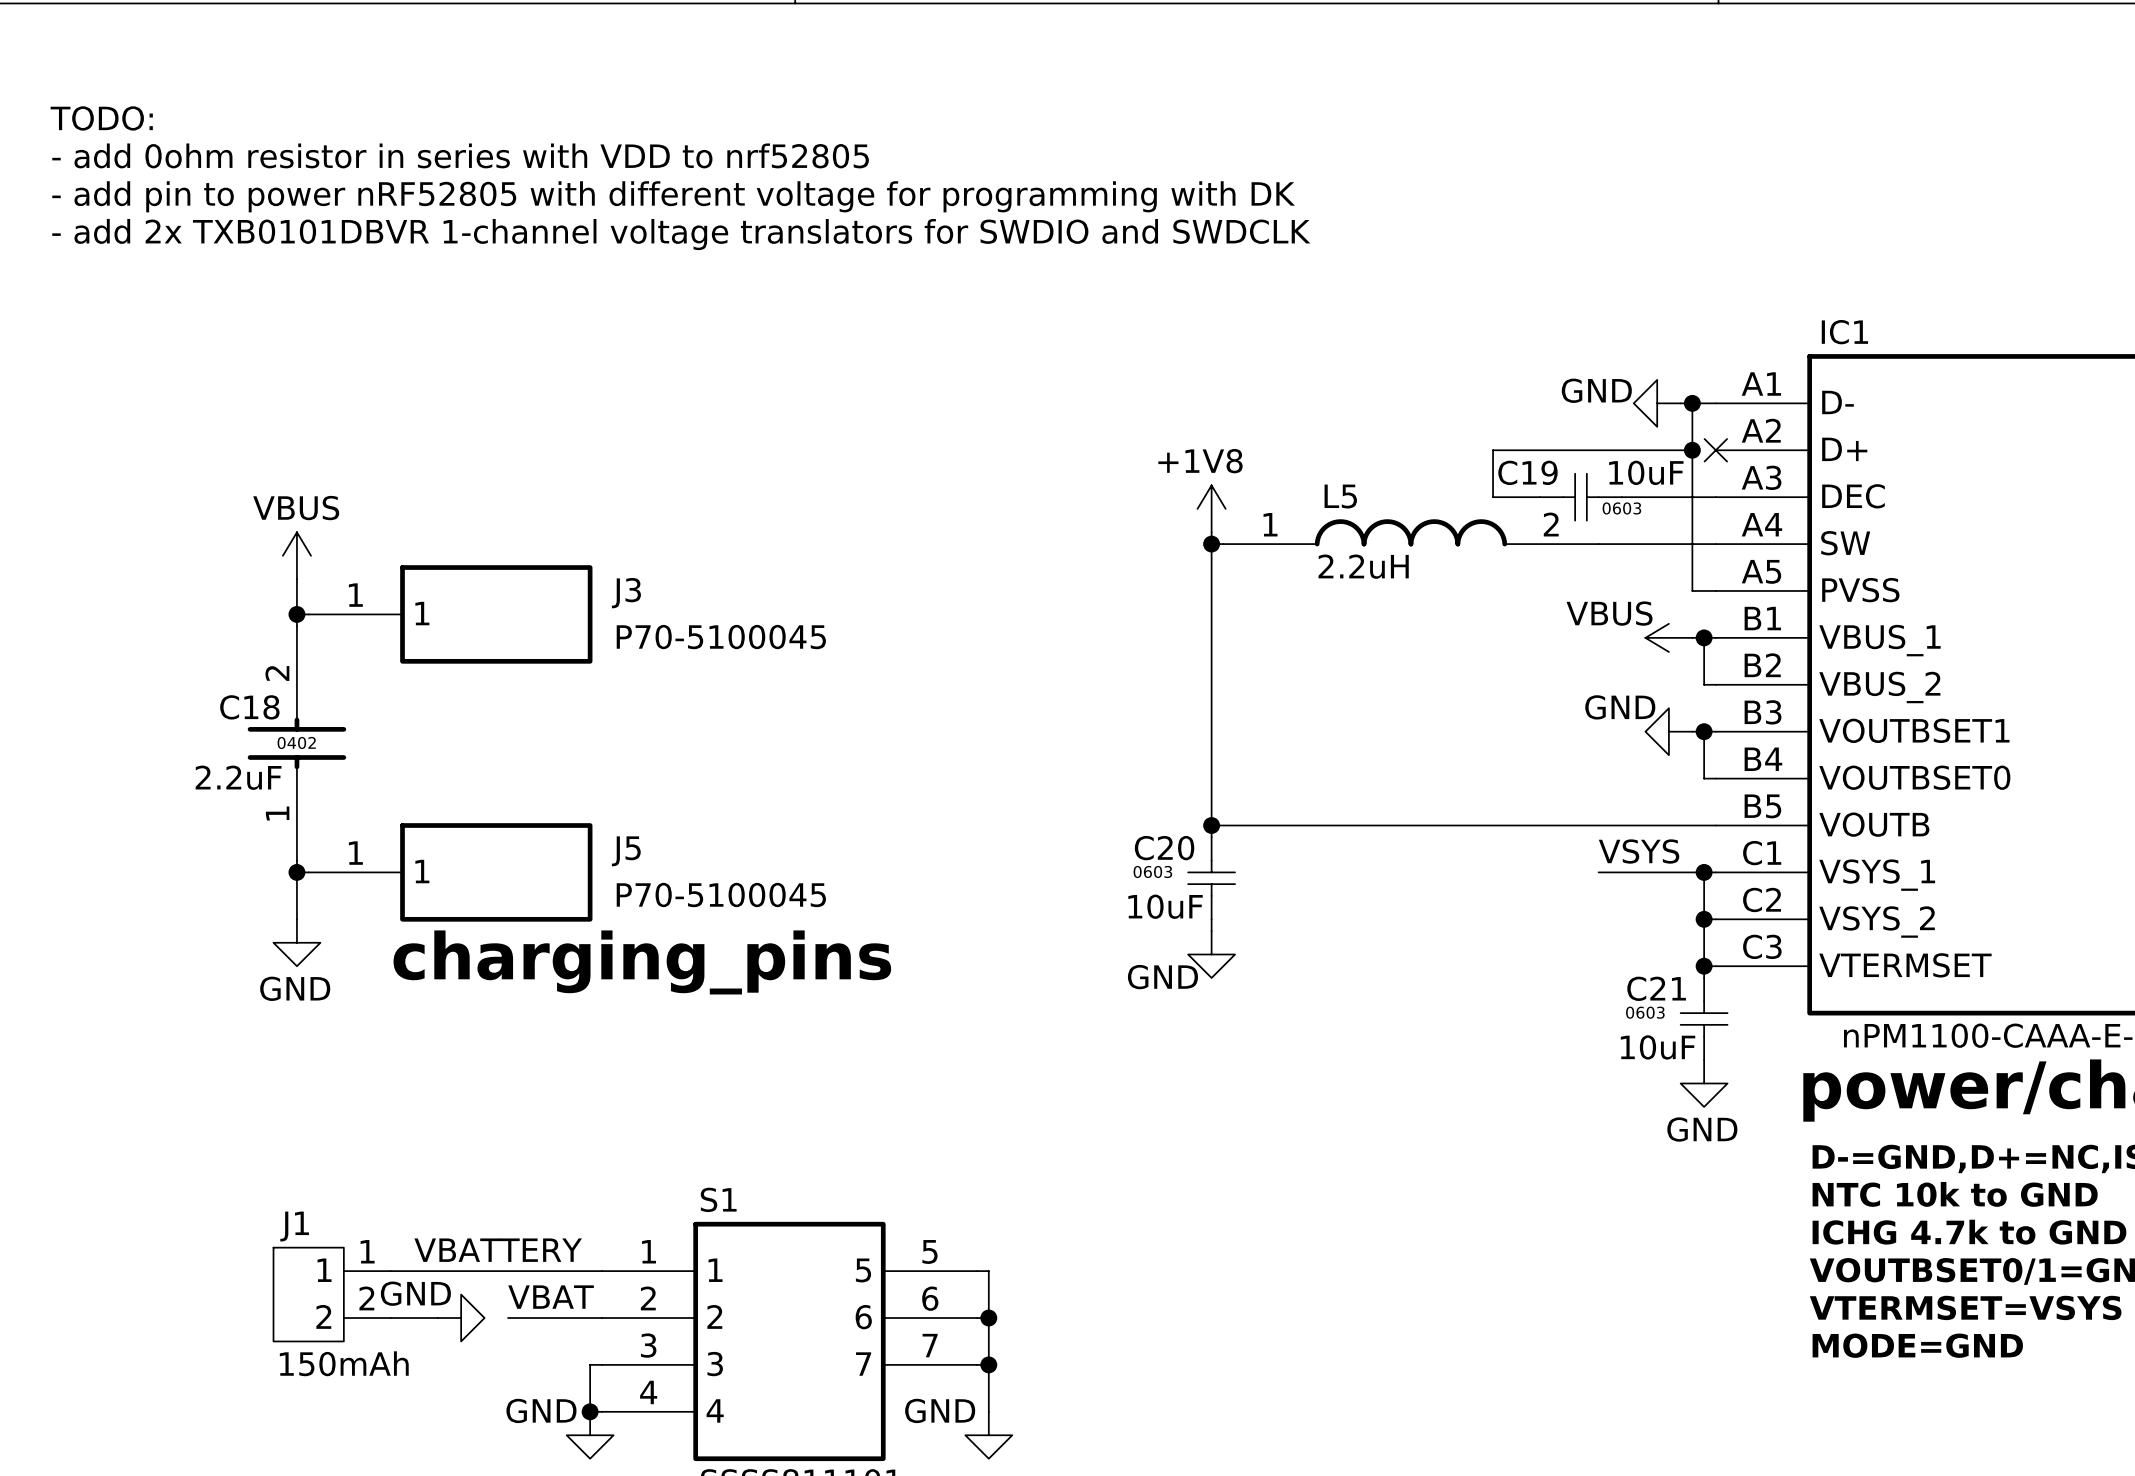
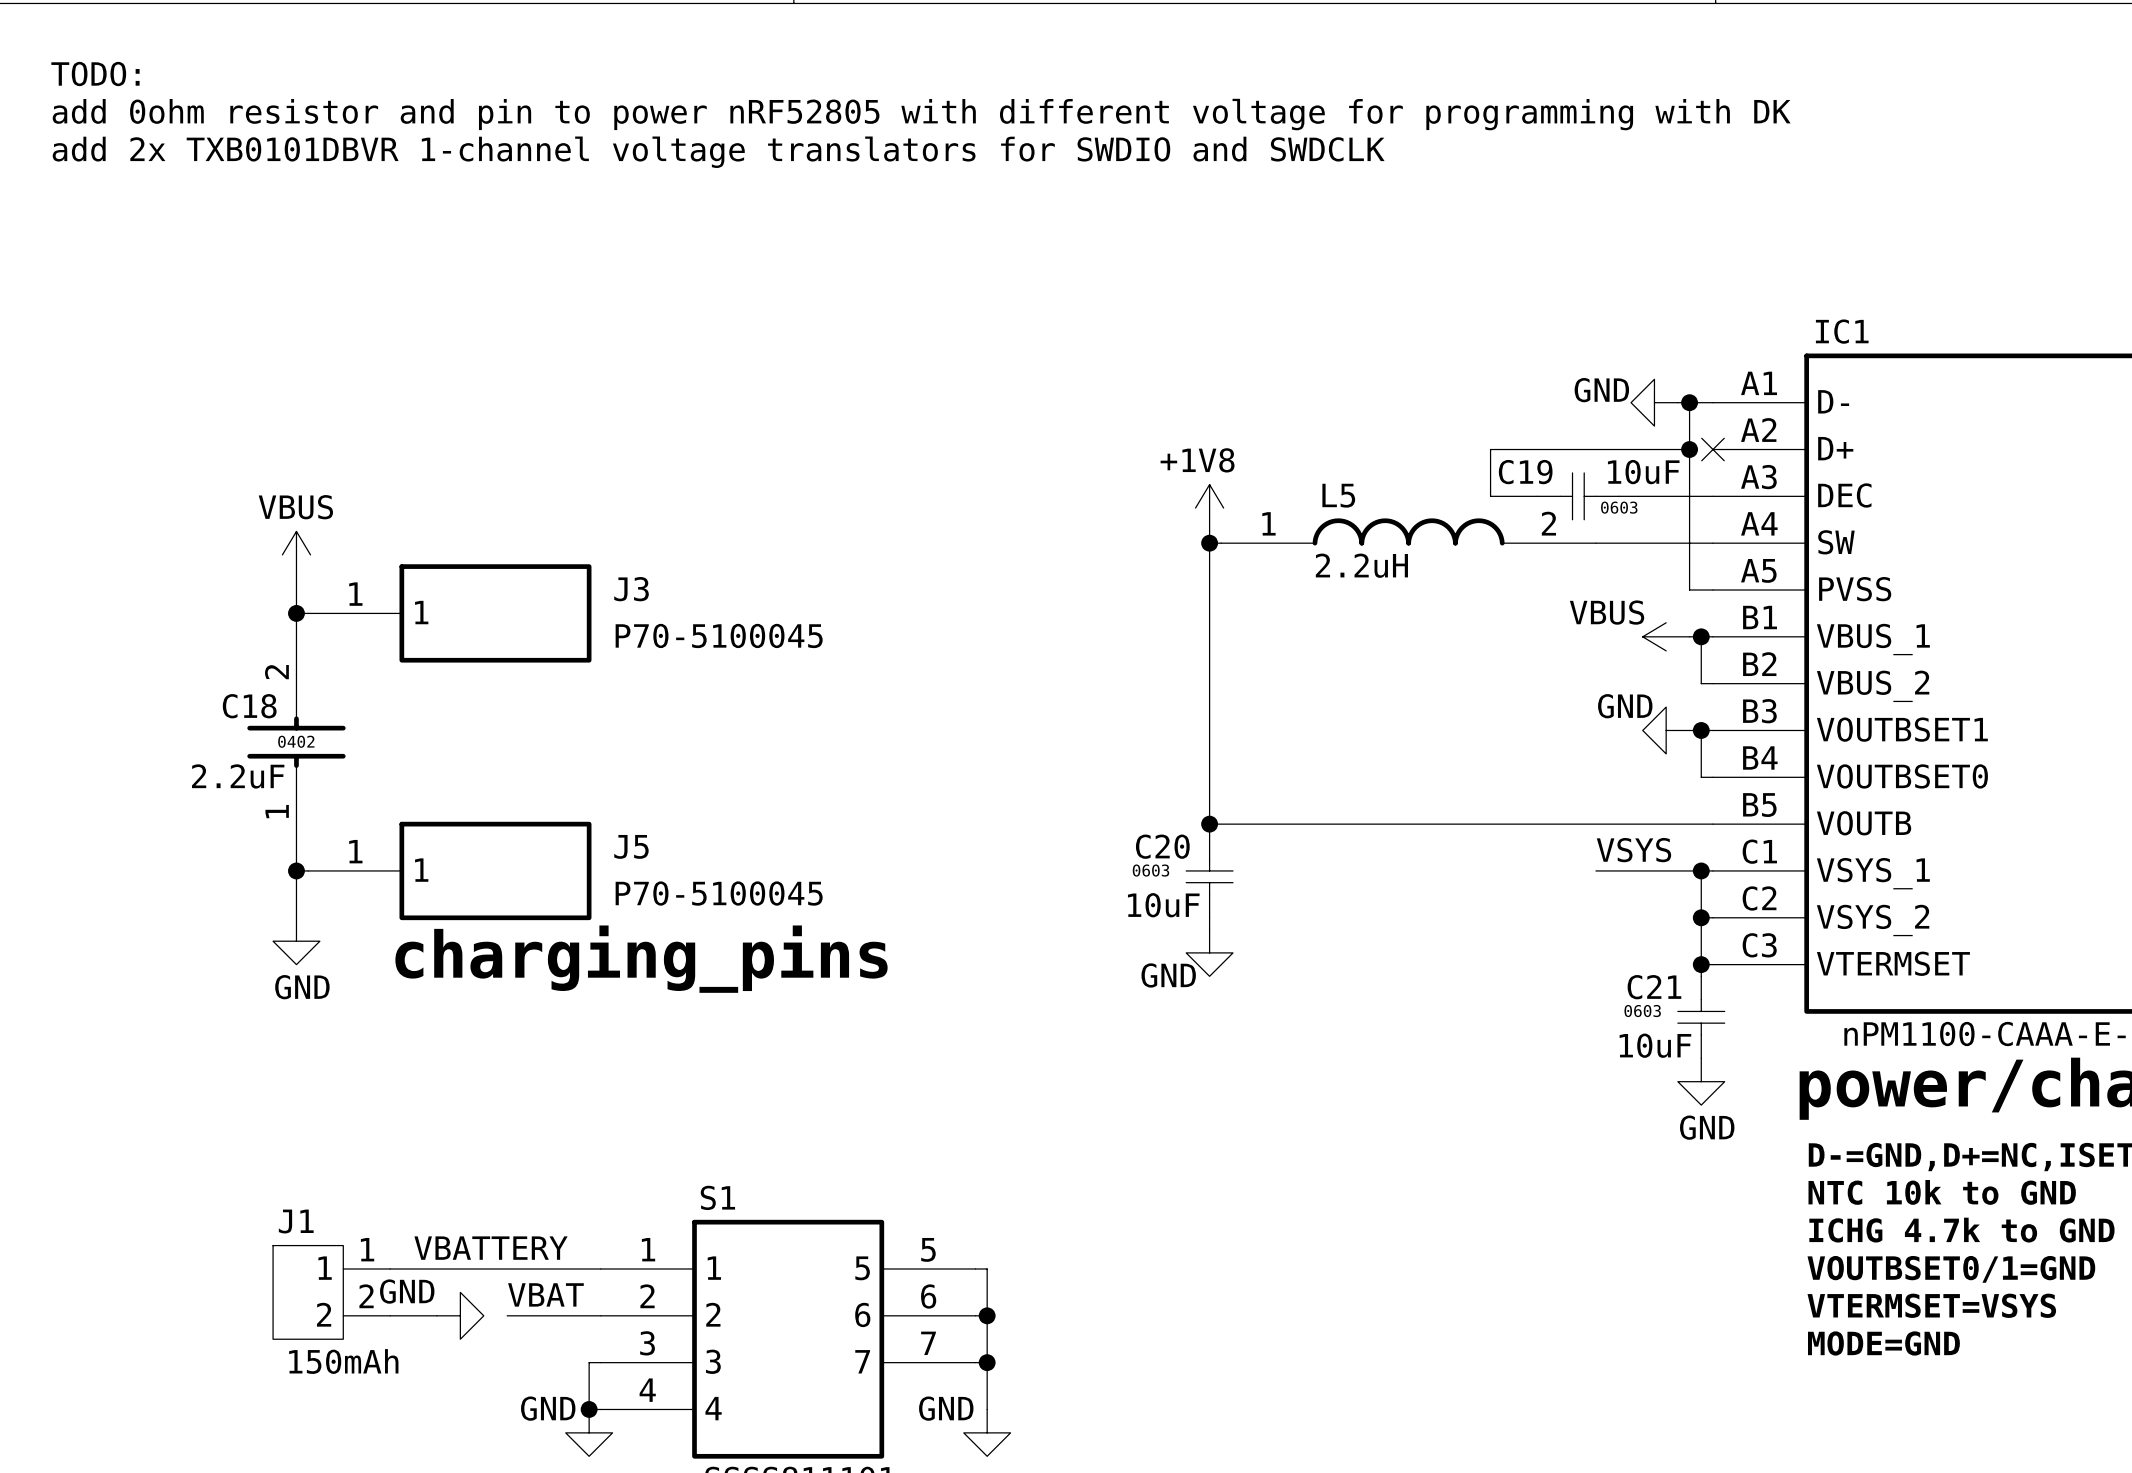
text: none -> add 0ohm resistor and pin to power nRF52805 with different voltage for programming with DK (921, 114)
text position: TODO: (101, 118) -> TODO: (95, 74)
text: - add 0ohm resistor in series with VDD to nrf52805 (460, 155) -> add 2x TXB0101DBVR 1-channel voltage translators for SWDIO and SWDCLK (718, 152)
text: - add pin to power nRF52805 with different voltage for programming with DK (673, 196) -> none
text: - add 2x TXB0101DBVR 1-channel voltage translators for SWDIO and SWDCLK (681, 234) -> none

